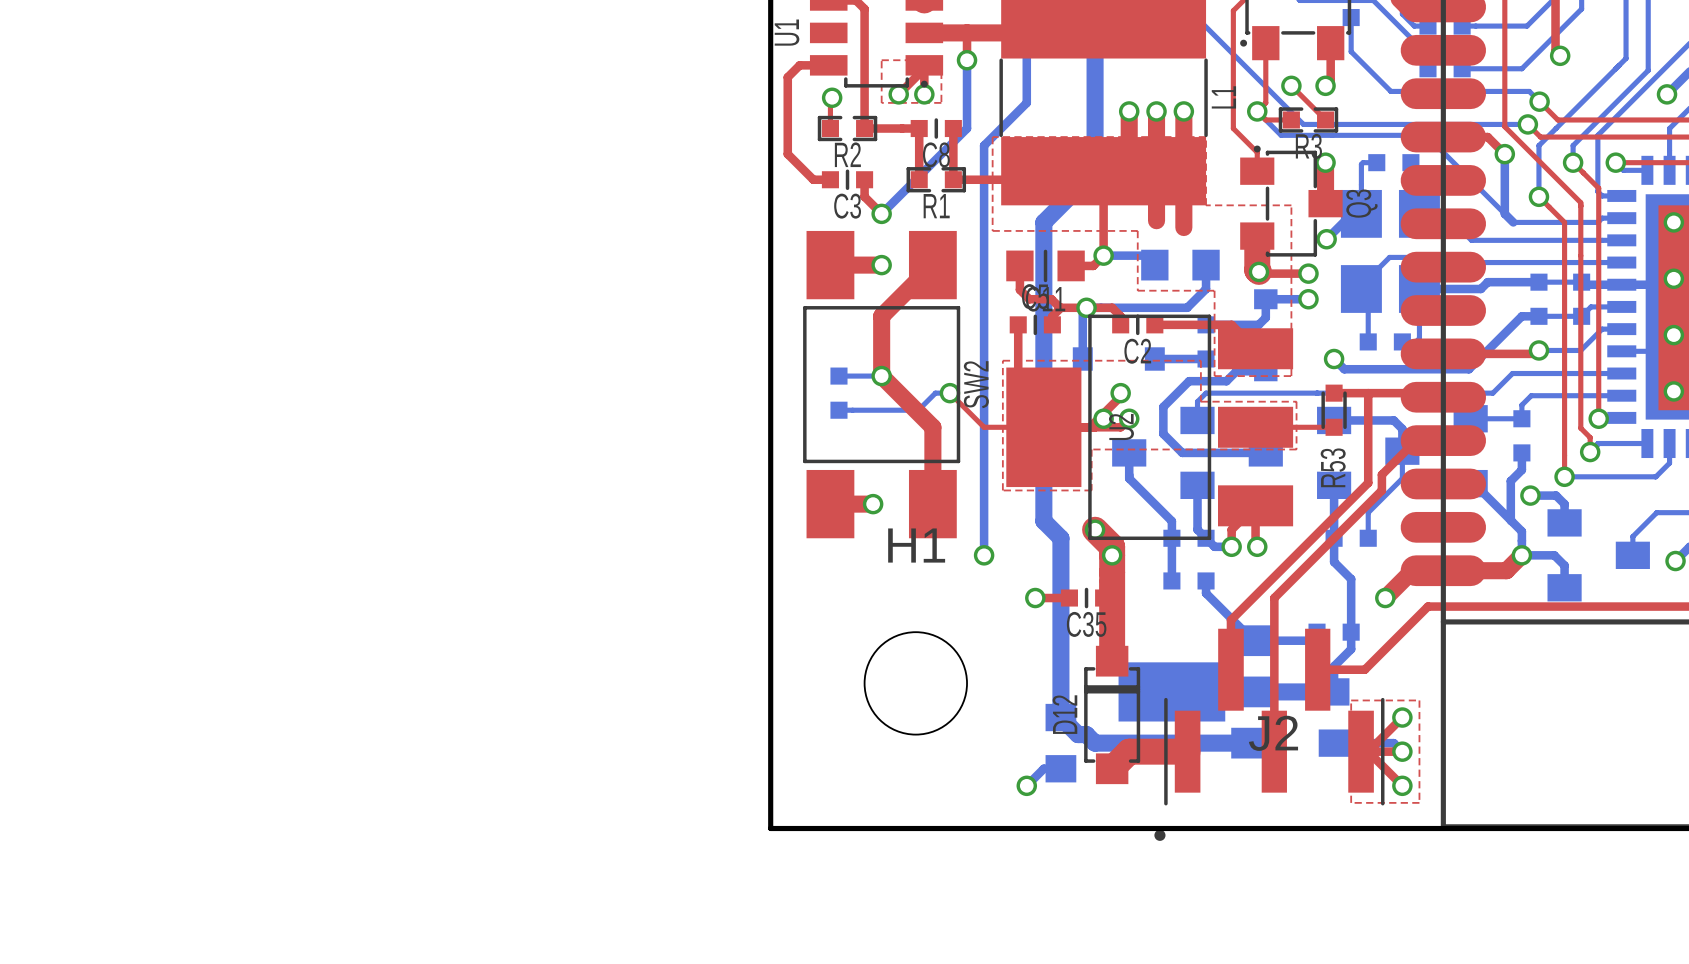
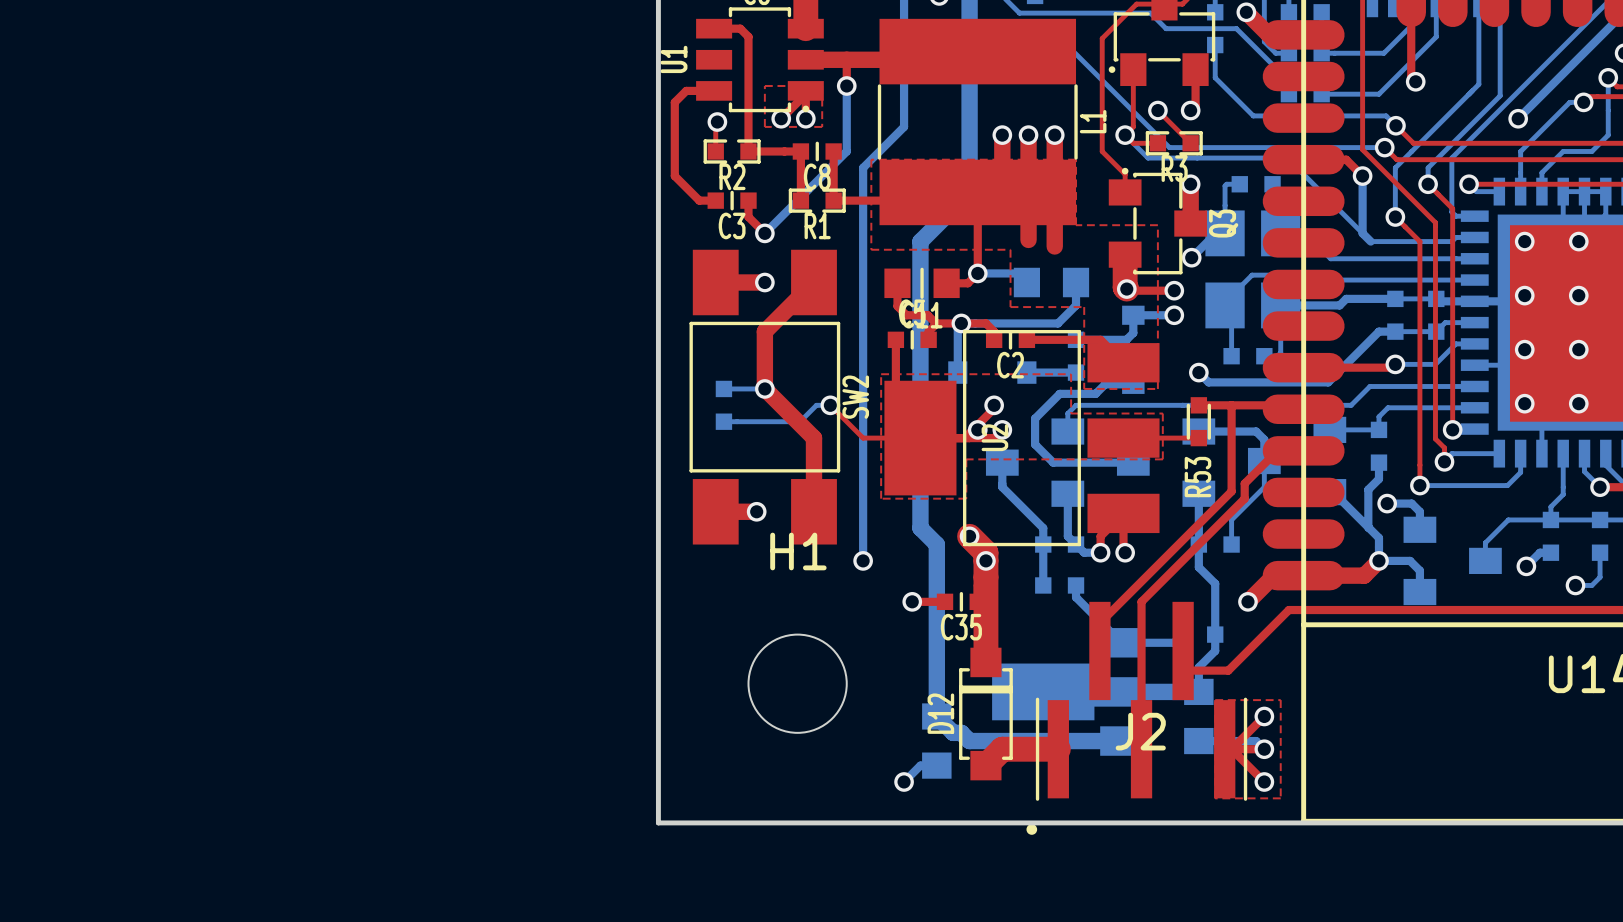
J2 footprint: [1154, 628, 1385, 841] -> [1026, 601, 1248, 835]

